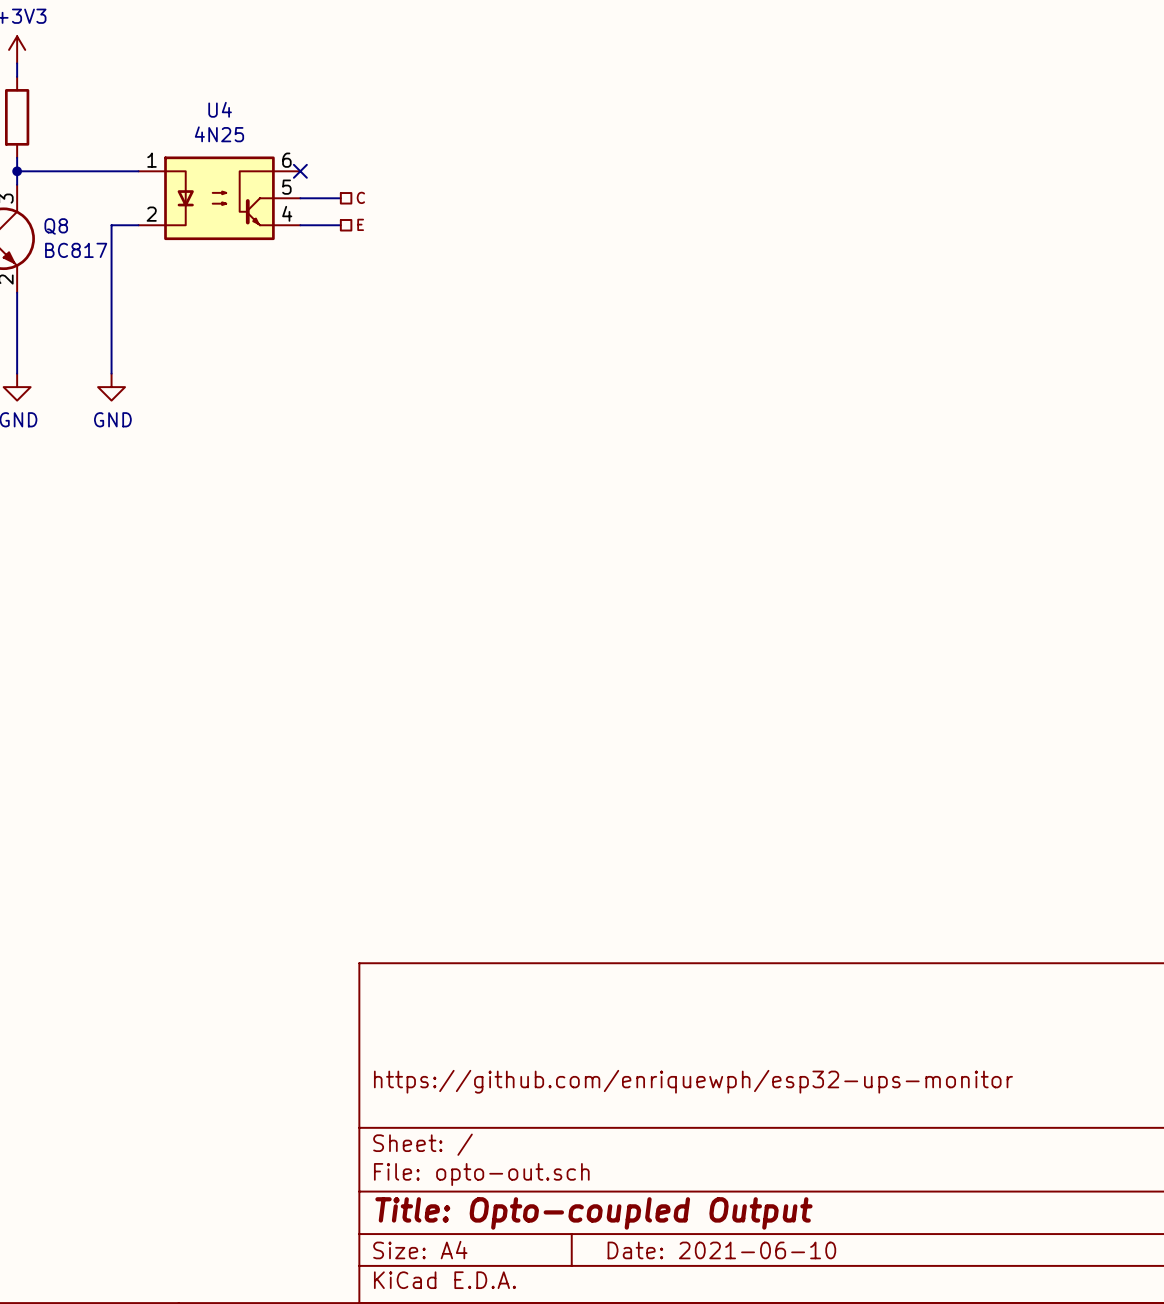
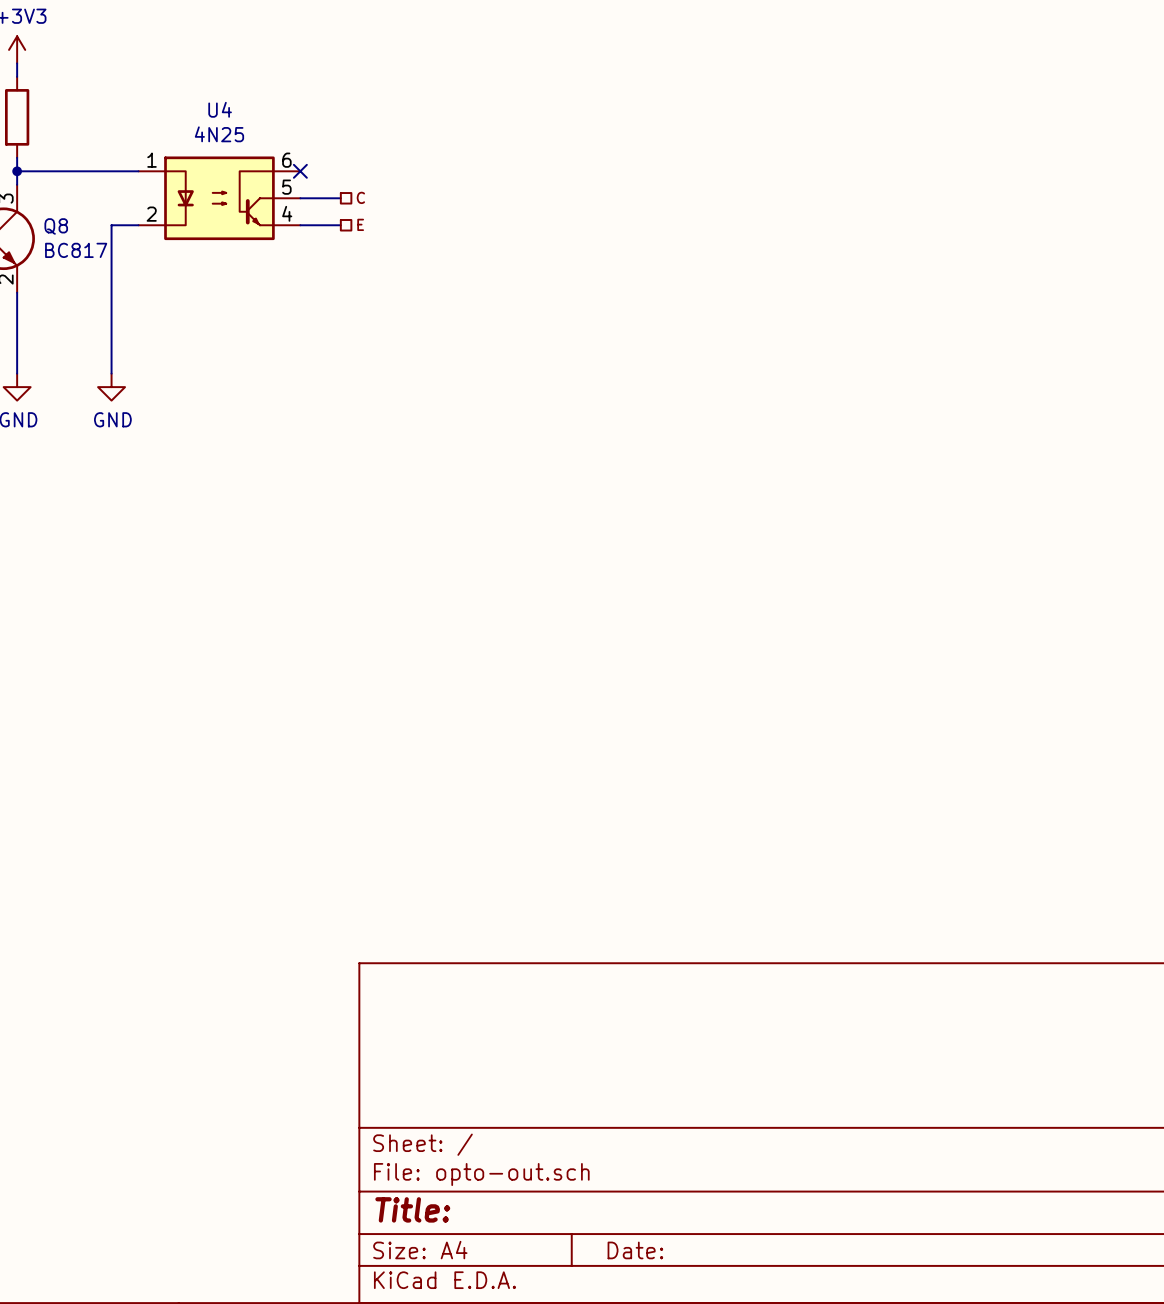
title block: https://github.com/enriquewph/esp32-ups-monitor (693, 1081) -> none
title block: Title: Opto-coupled Output (593, 1213) -> Title: (412, 1209)
title block: Date: 2021-06-10 (721, 1250) -> Date: (635, 1250)

